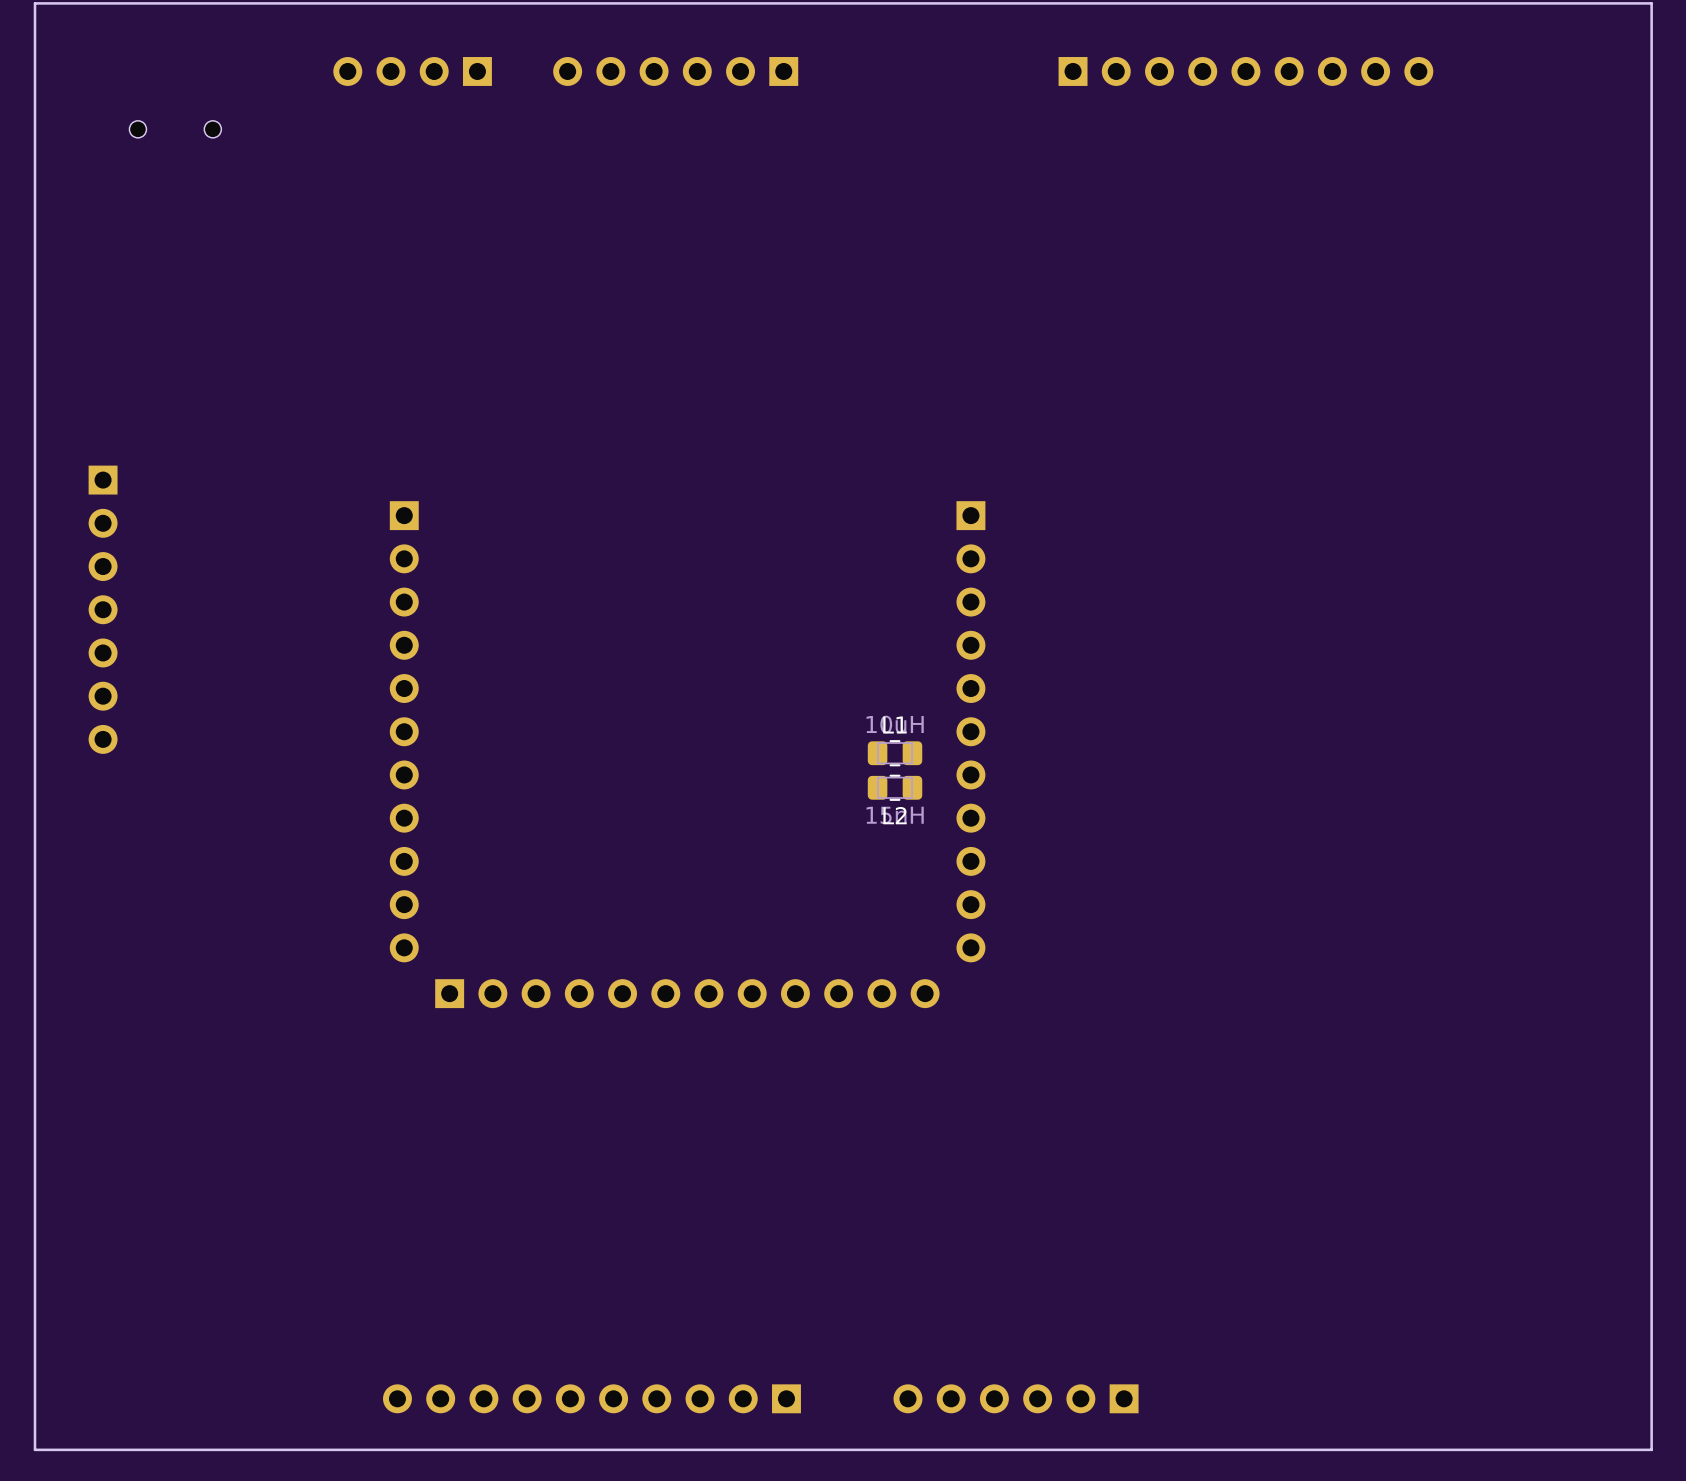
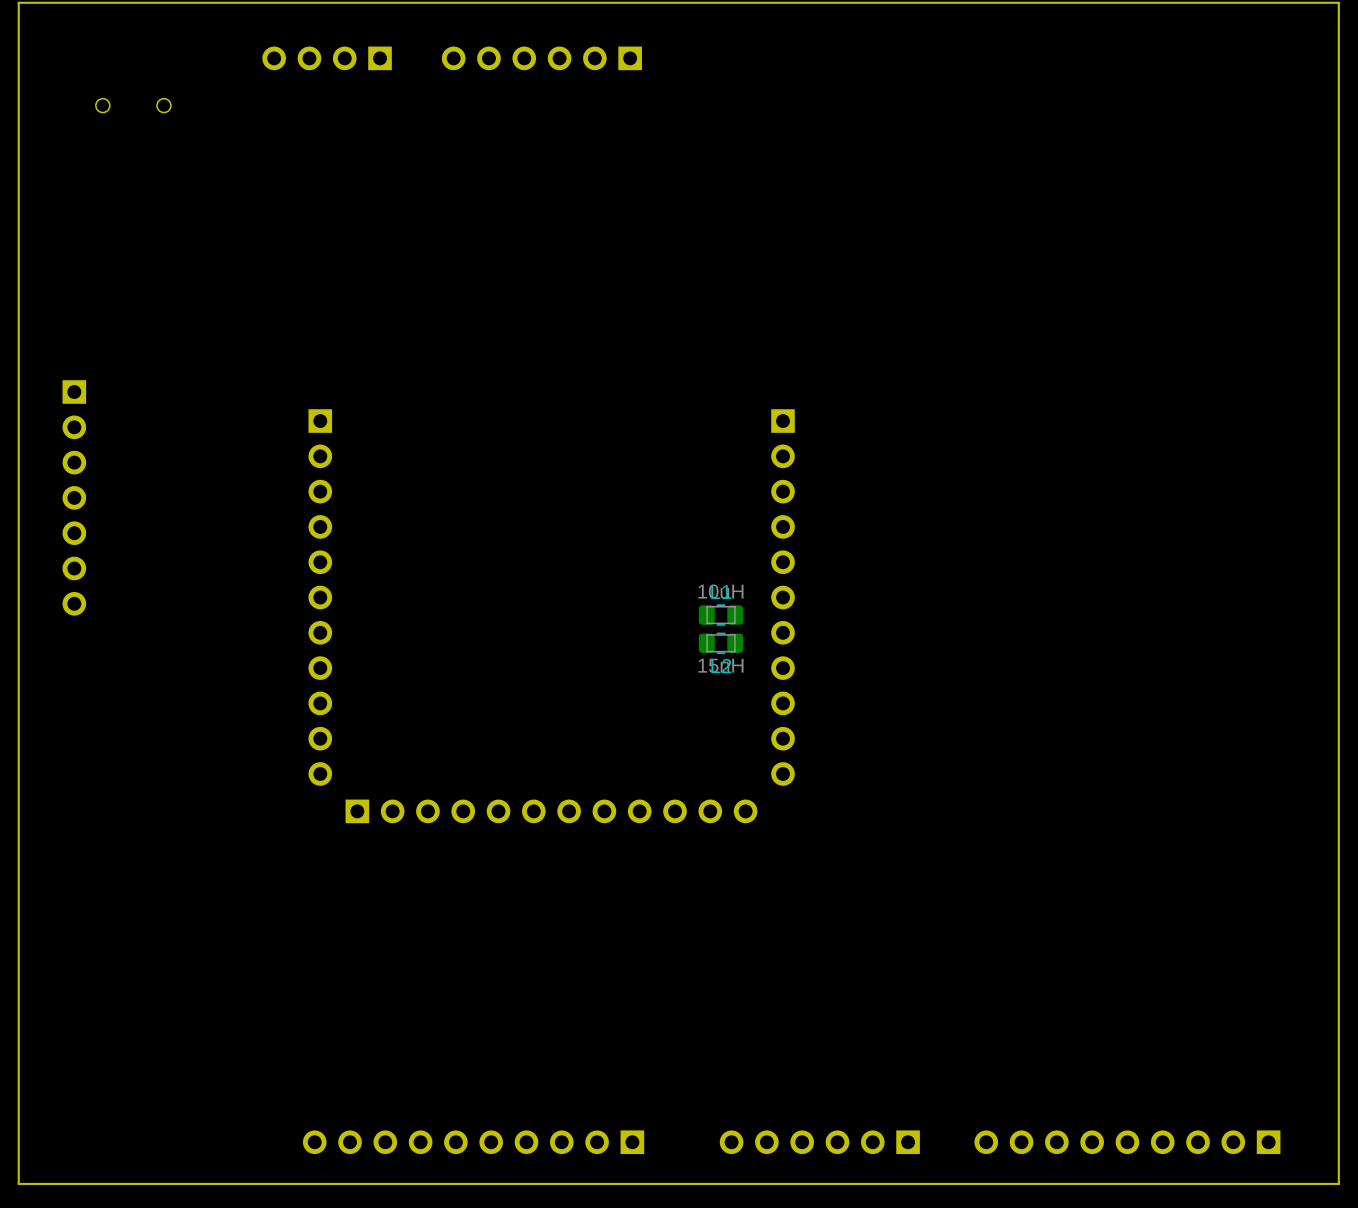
part: (1245, 71) -> none
part: none -> (1127, 1142)

